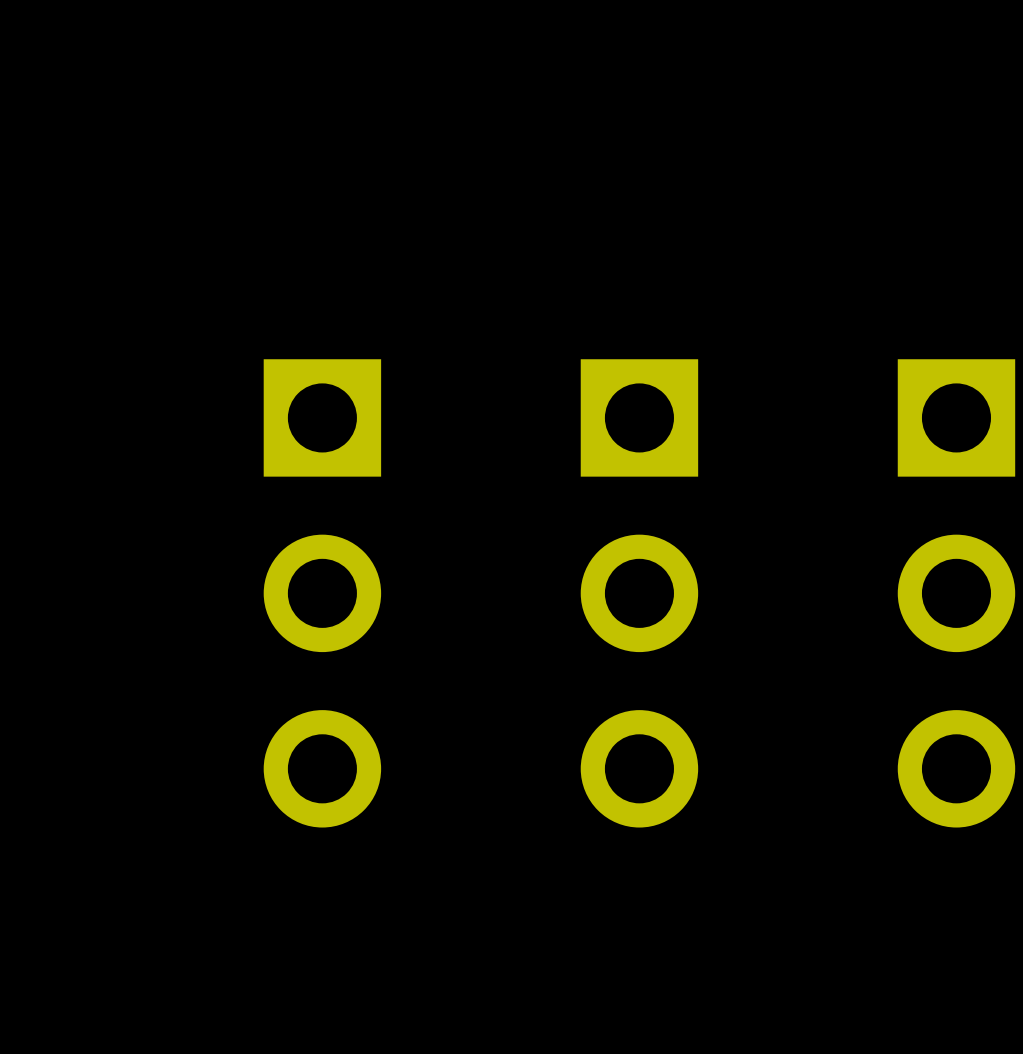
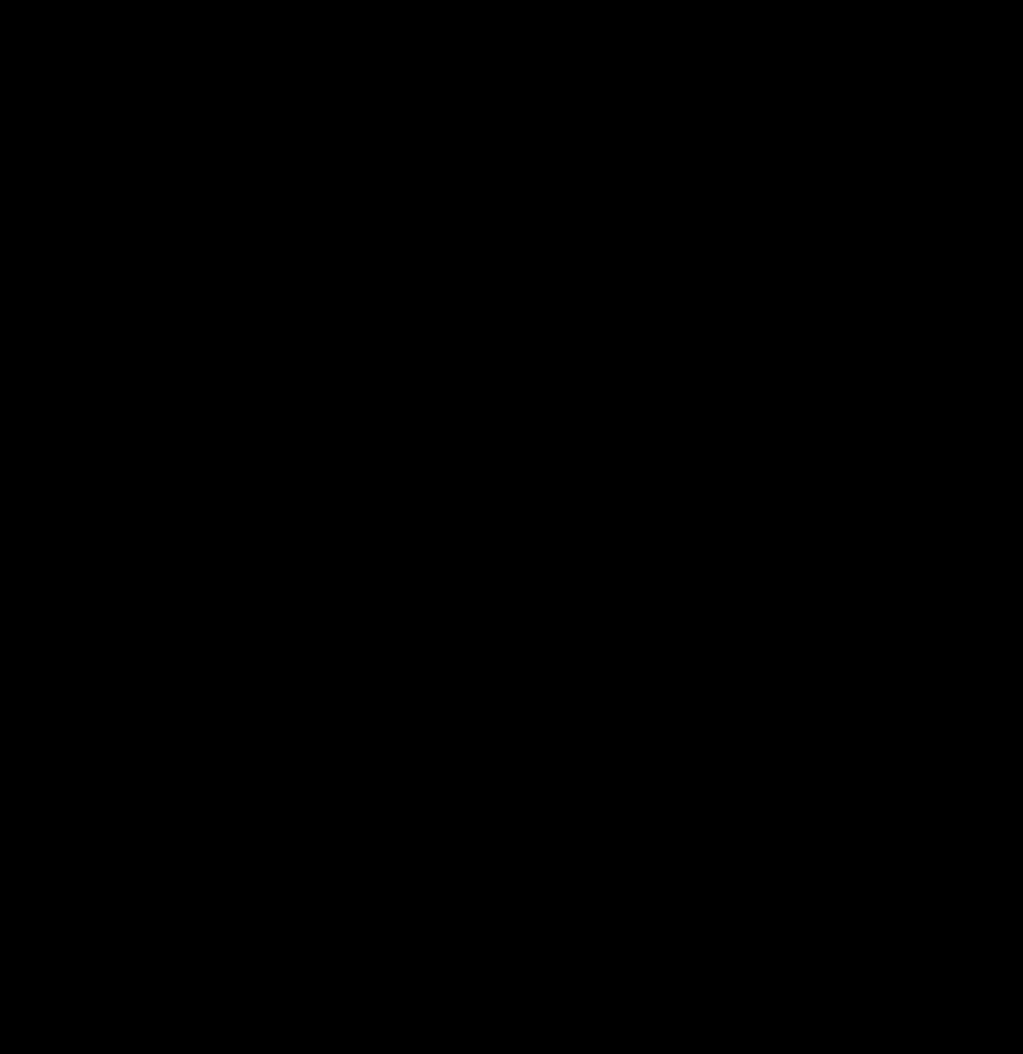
part: (322, 593) -> none
part: (639, 593) -> none
part: (956, 593) -> none

